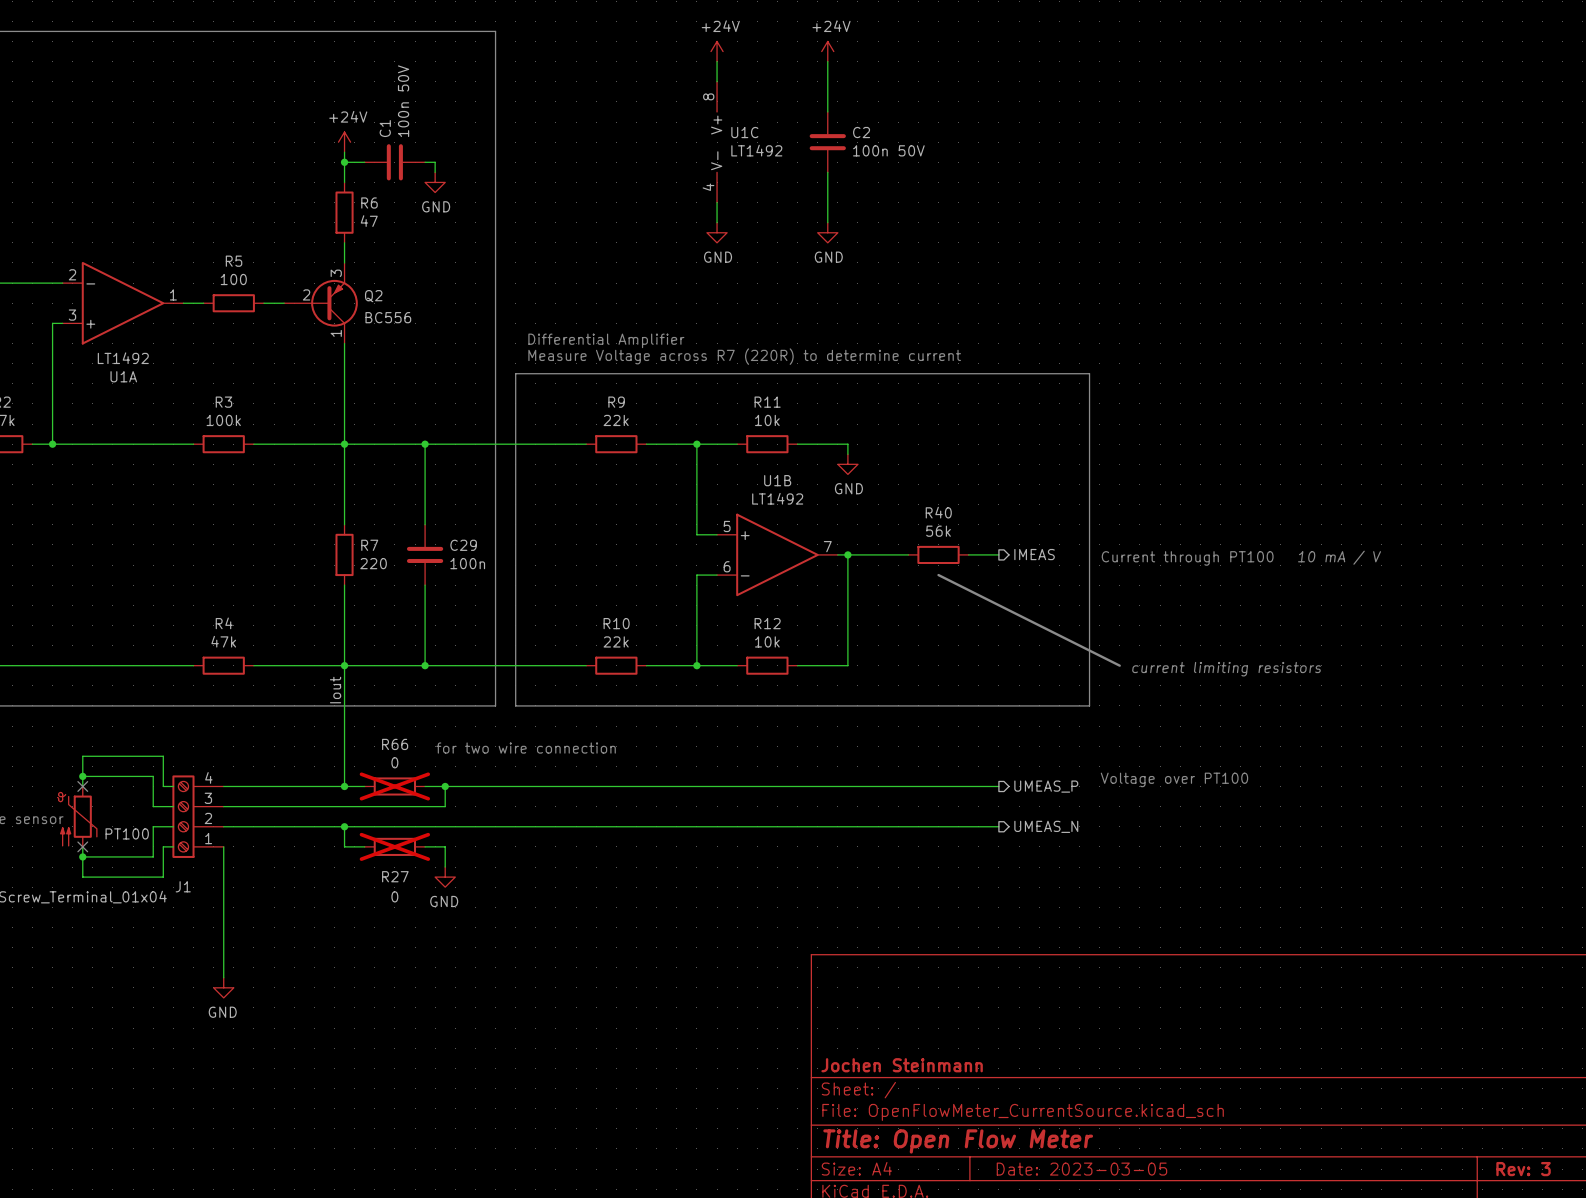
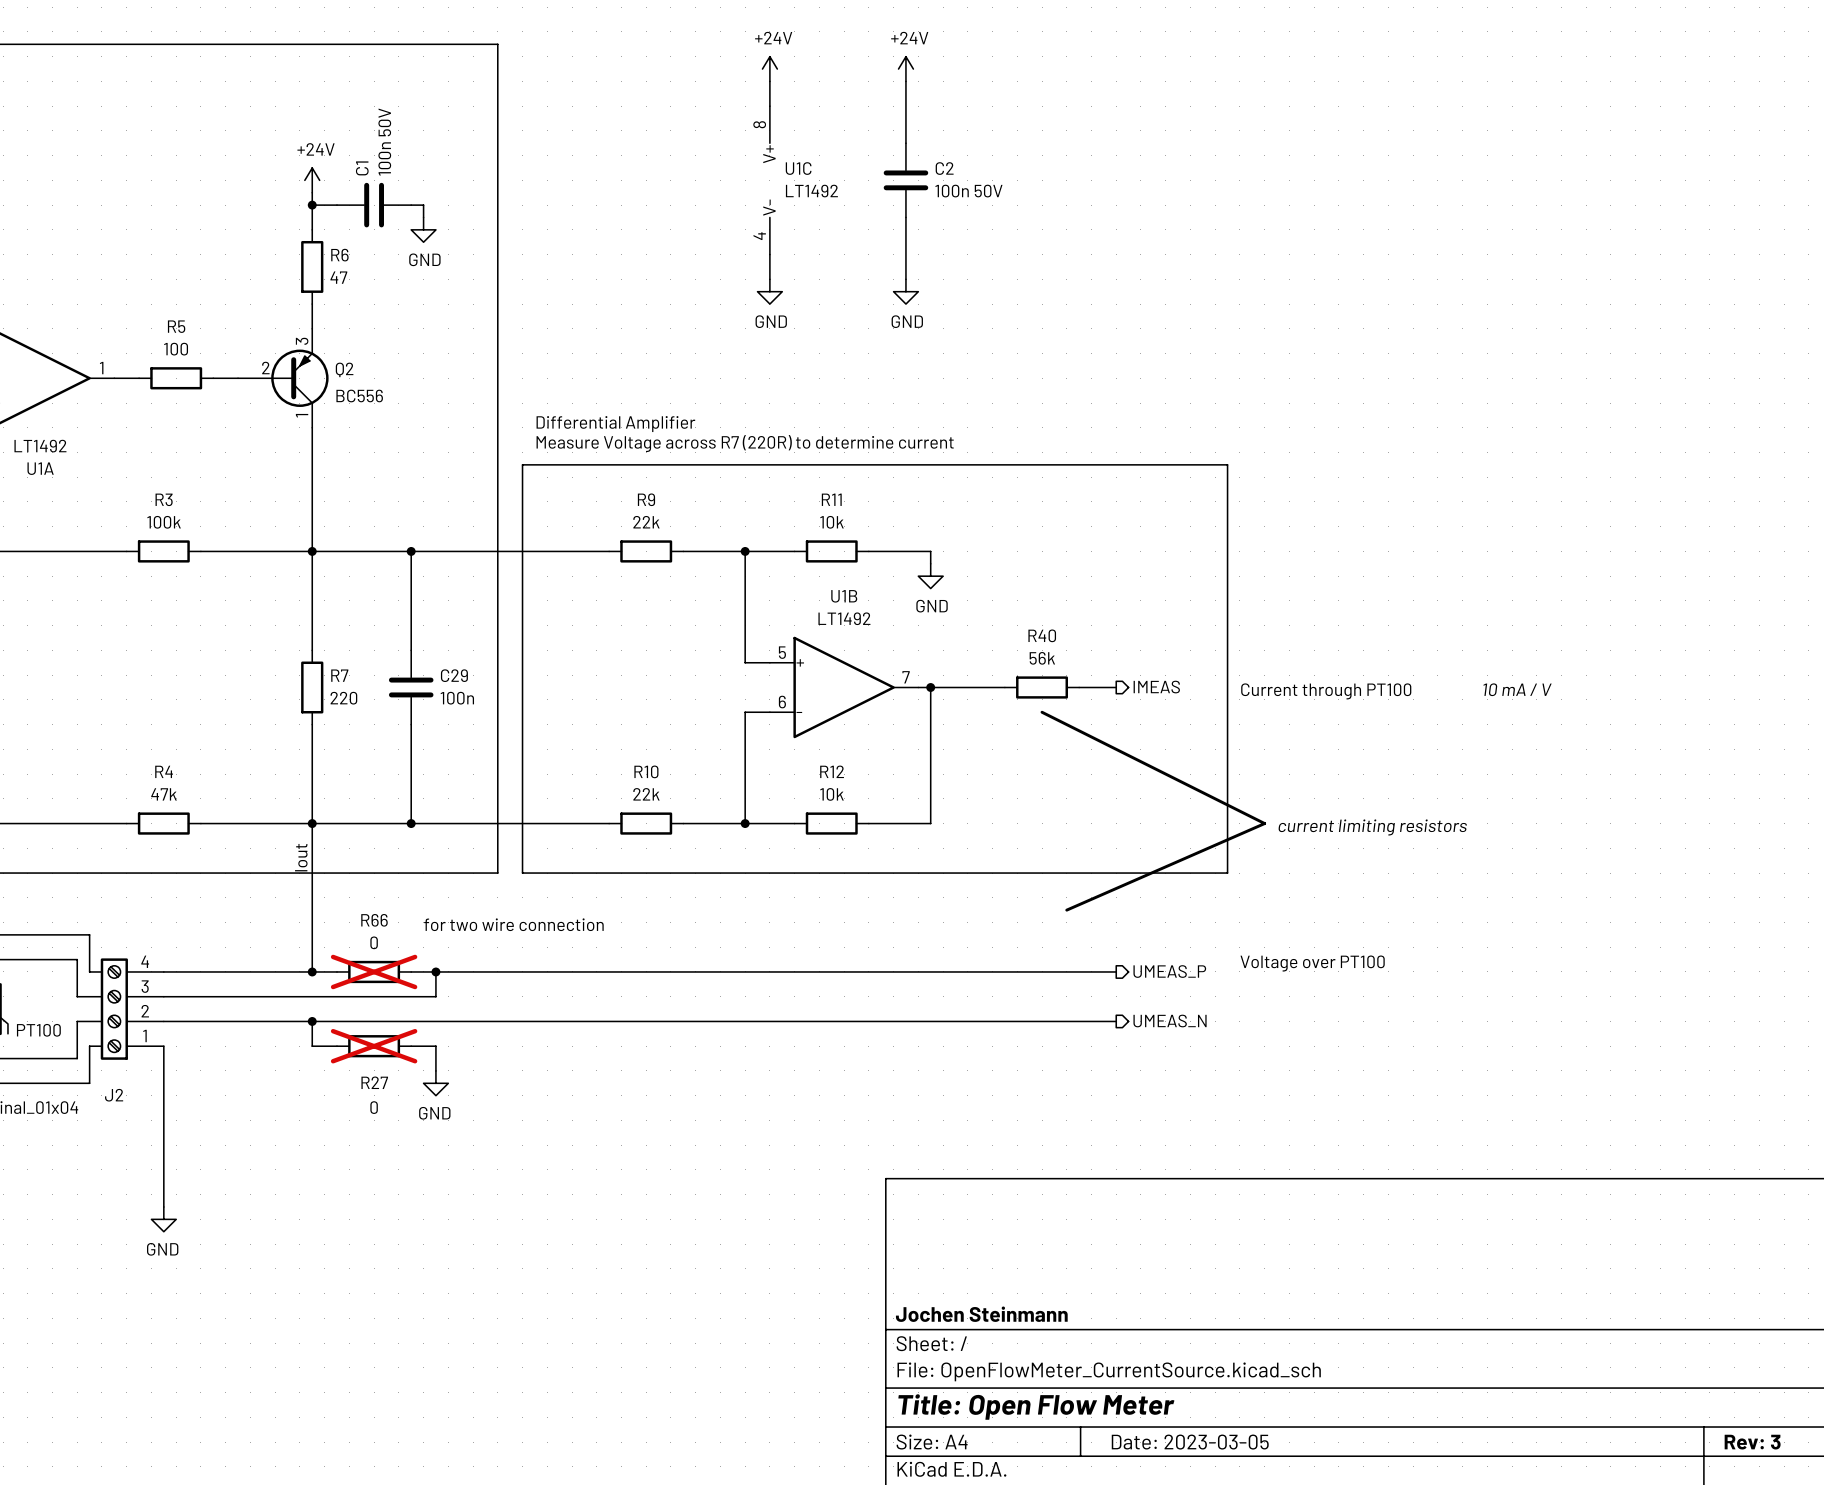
line: none -> (1264, 823) (1066, 910)
J1 name: J1 (183, 886) -> J2 (114, 1095)

